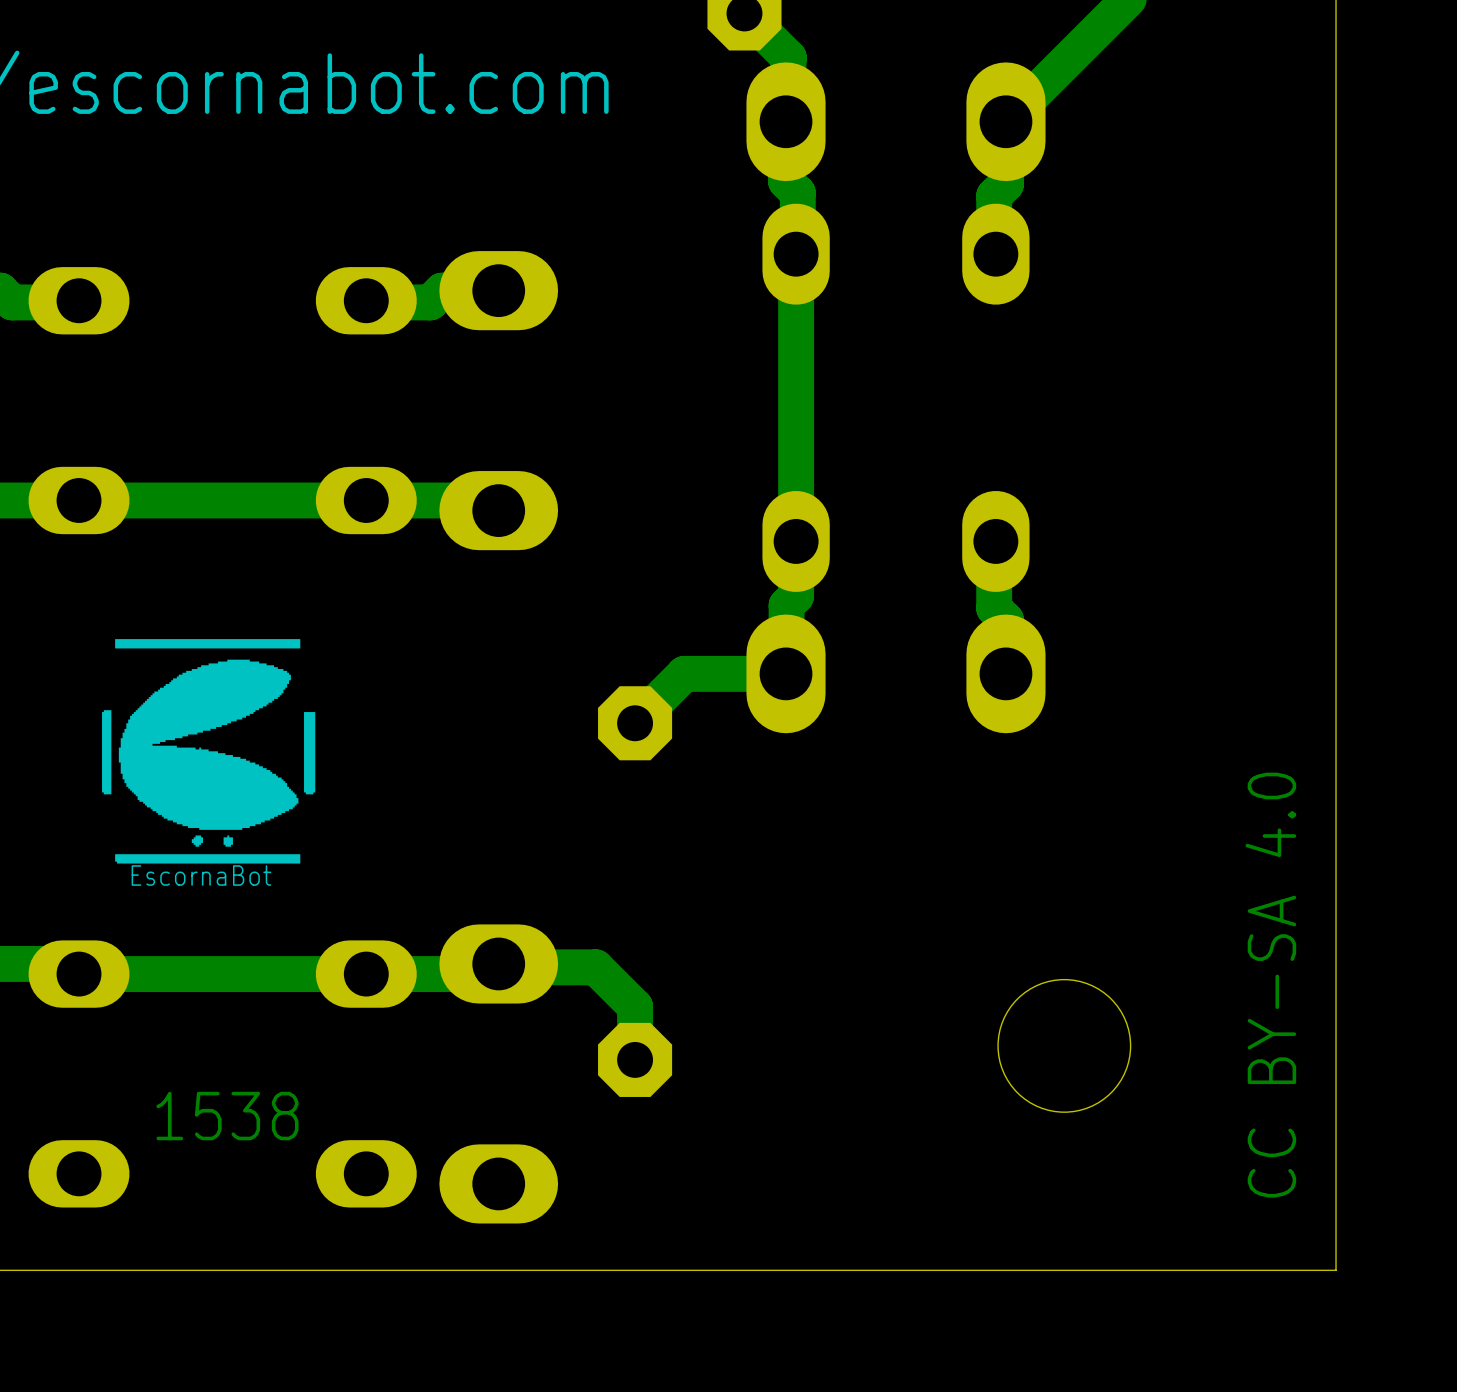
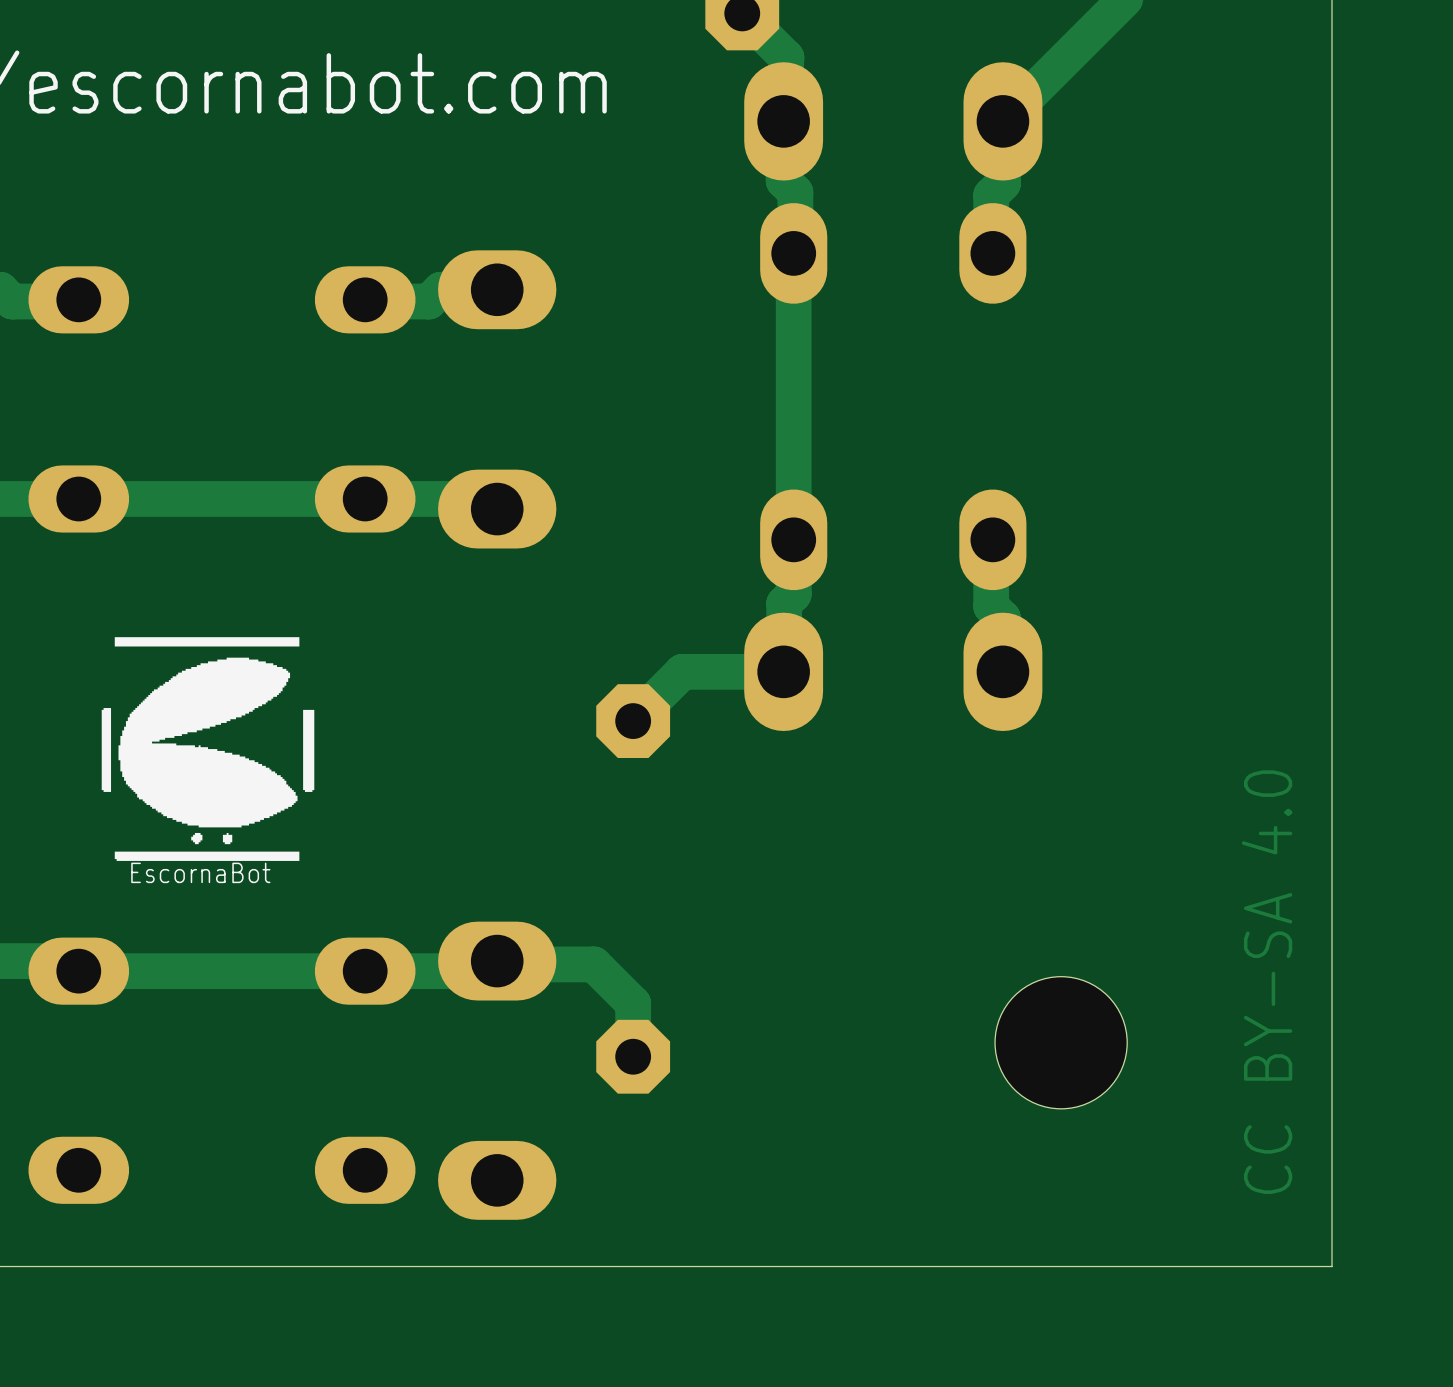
text: 1538 (227, 1116) -> none

